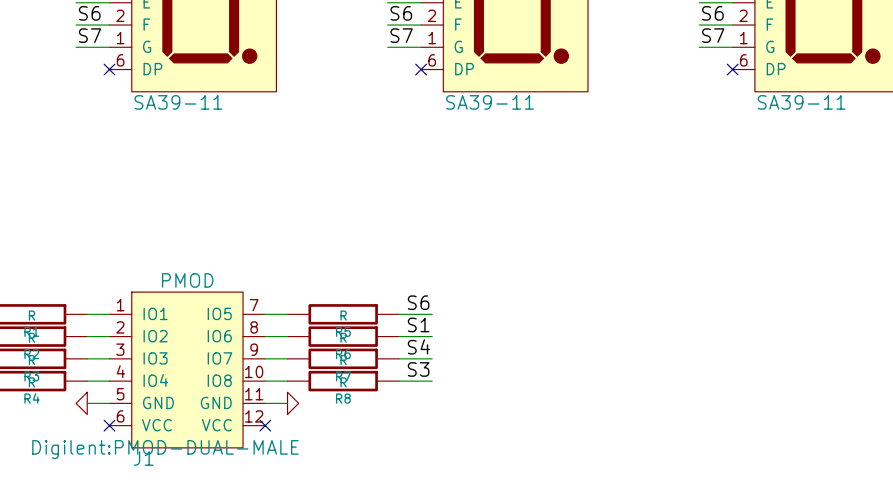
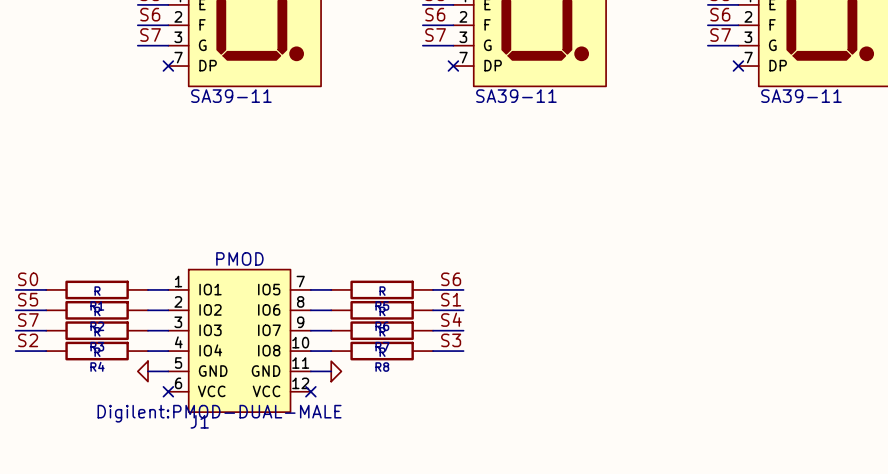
part pin number: 1 (120, 38) -> 3 (178, 37)
part pin number: 1 (432, 38) -> 3 (463, 37)
part pin number: 1 (743, 38) -> 3 (748, 37)
part pin number: 6 (120, 60) -> 7 (178, 57)
part pin number: 6 (432, 60) -> 7 (463, 57)
part pin number: 6 (743, 60) -> 7 (748, 57)

